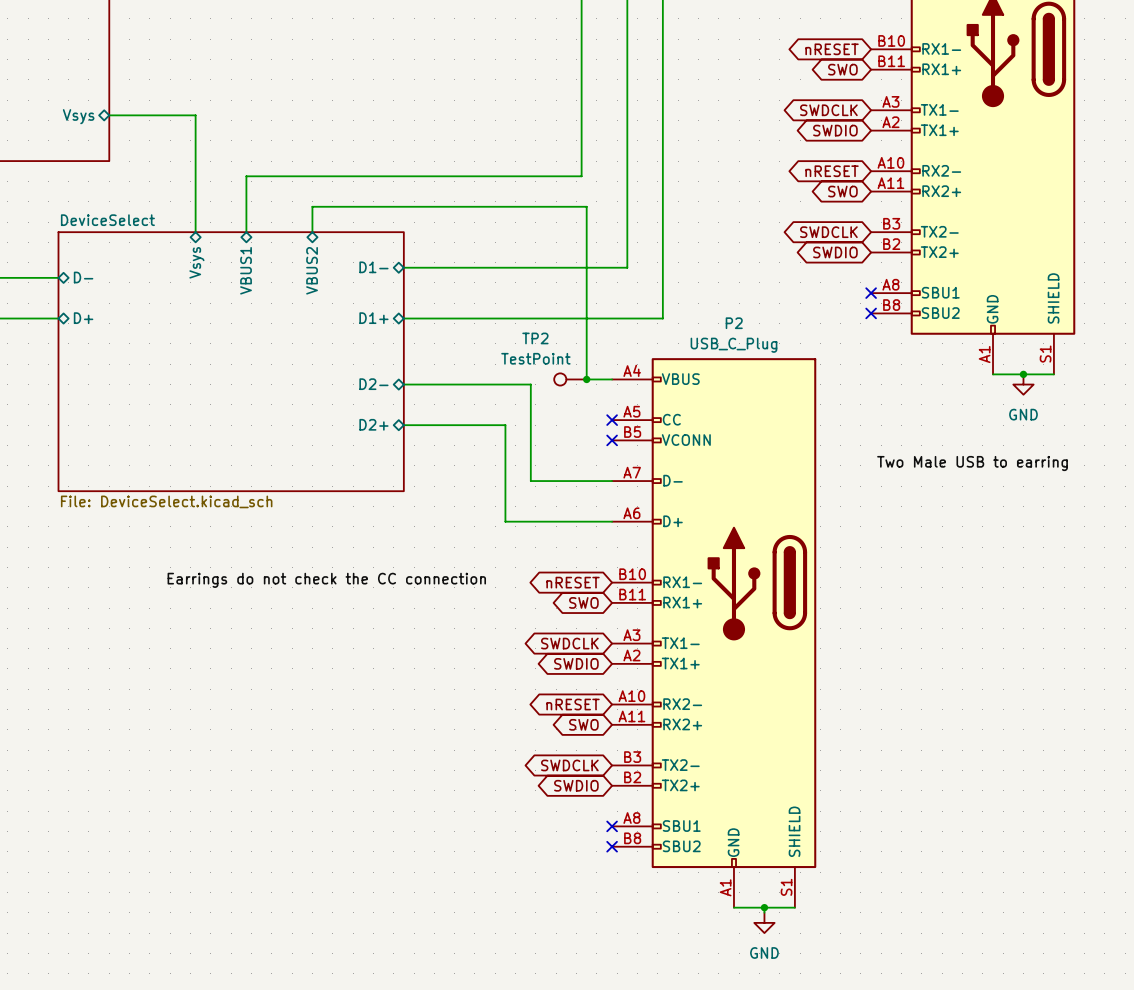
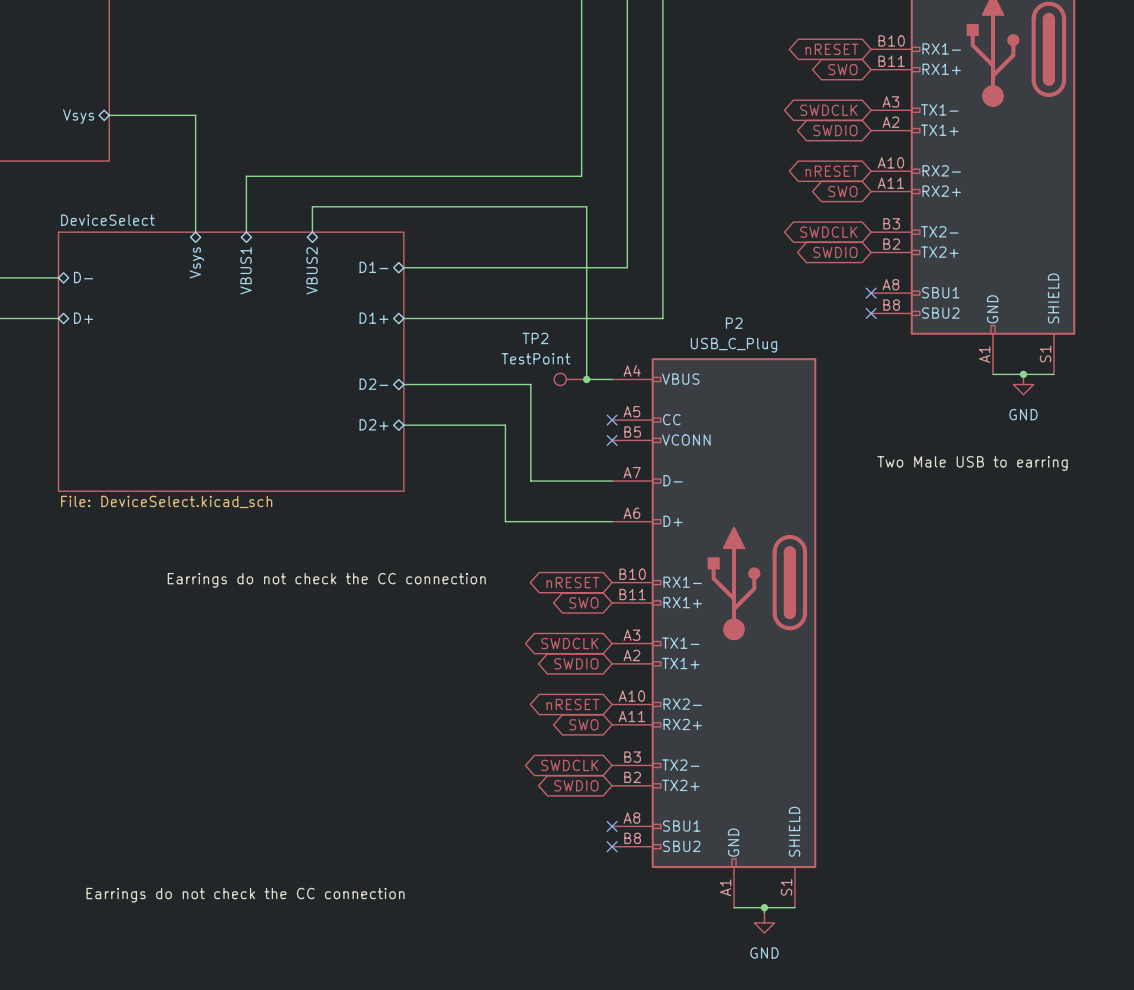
label: none -> Earrings do not check the CC connection (245, 895)

